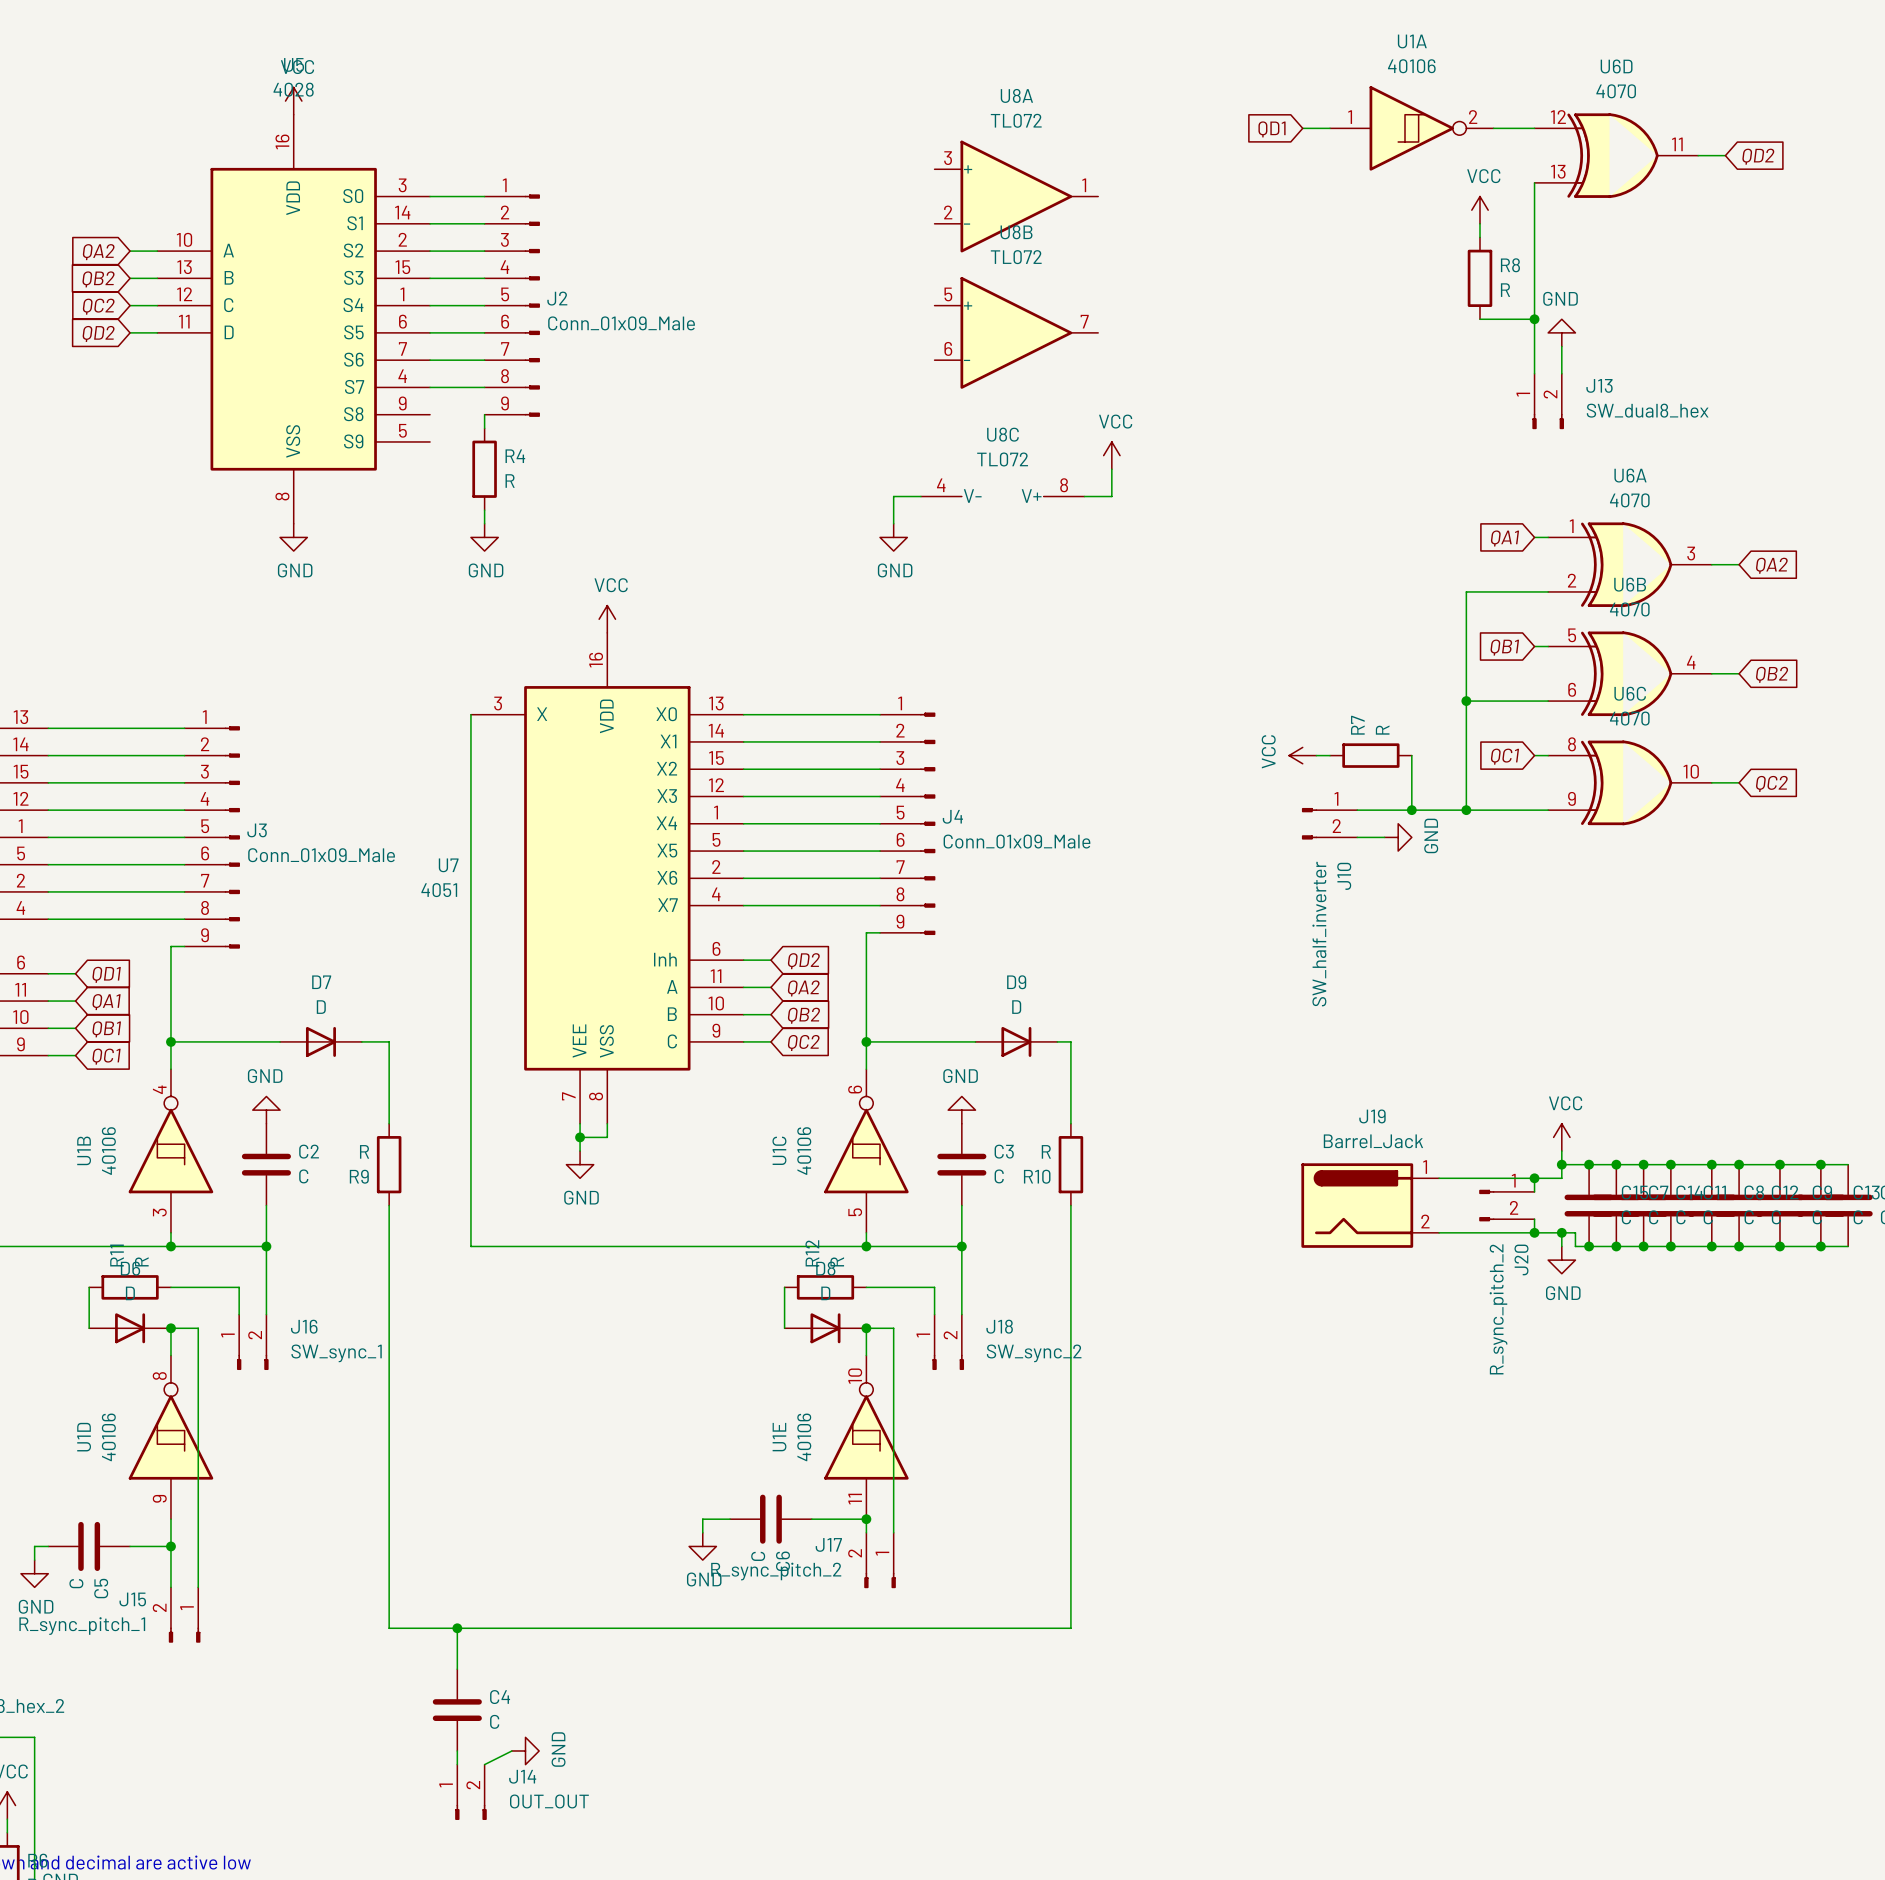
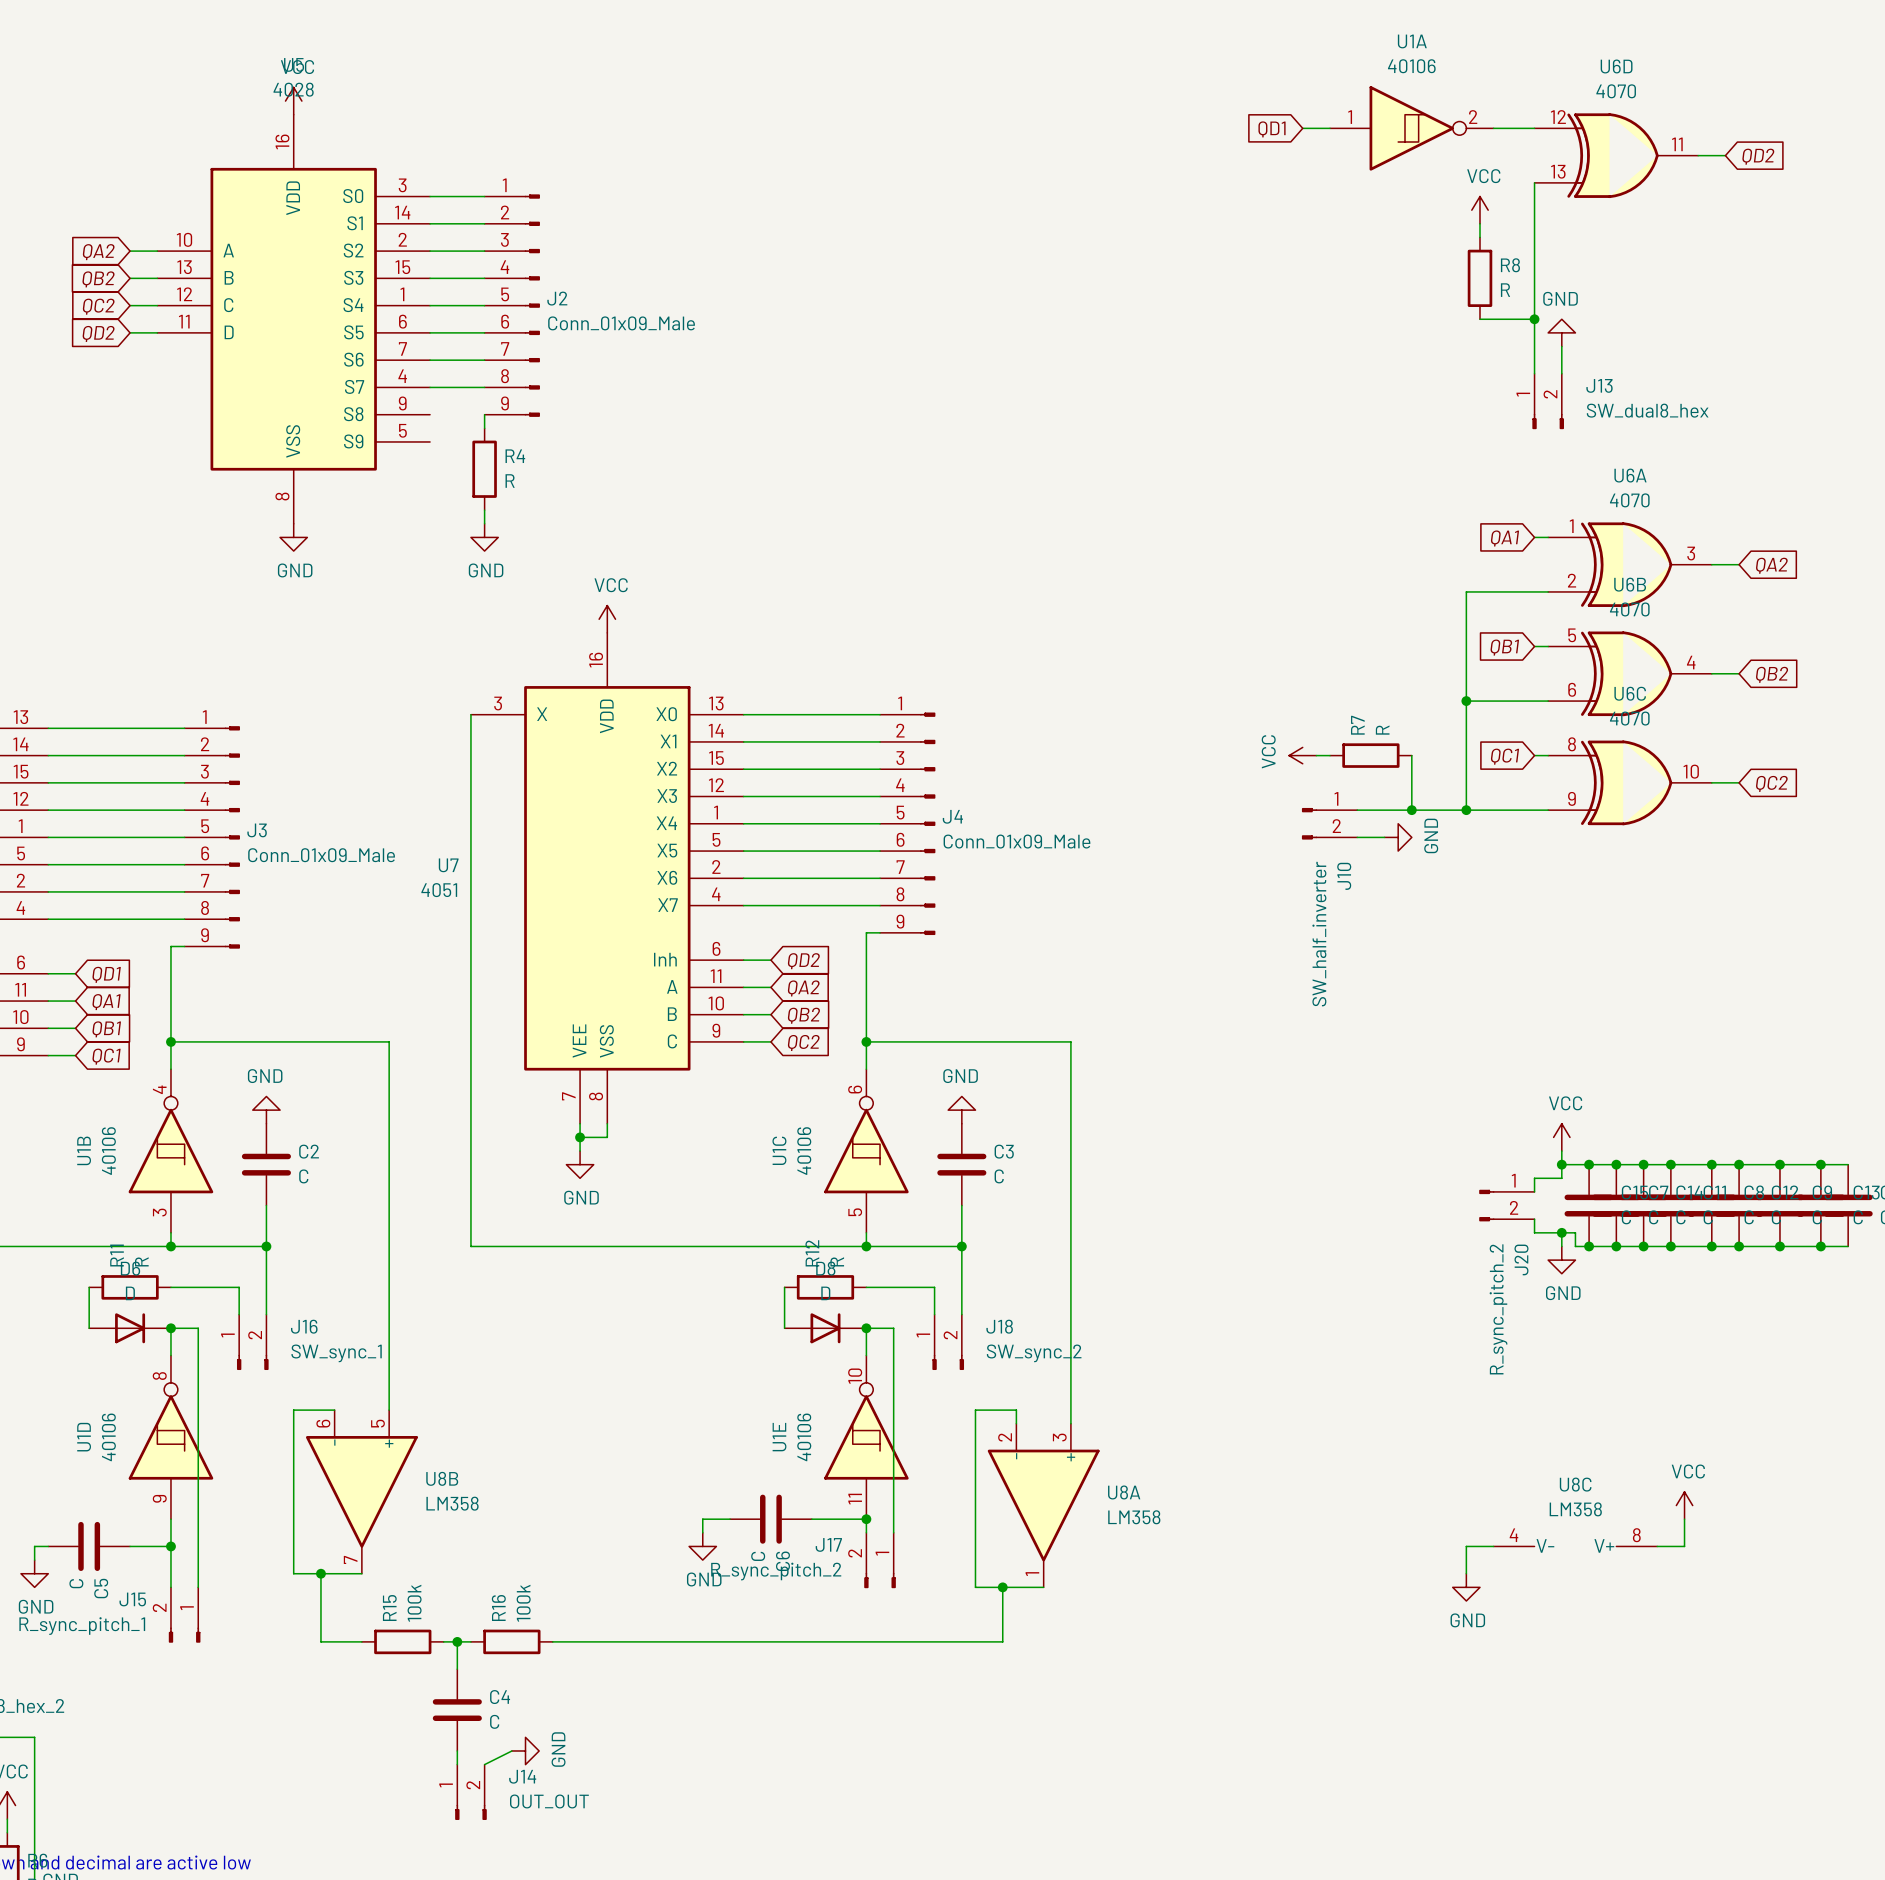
U8A value: TL072 (1016, 120) -> LM358 (1134, 1517)
U8A rotation: 0° (1016, 196) -> 90° clockwise (1043, 1505)
U8A position: (1016, 196) -> (1043, 1505)
U8B value: TL072 (1016, 257) -> LM358 (452, 1503)
U8B rotation: 0° (1016, 332) -> 90° clockwise (361, 1491)
U8B position: (1016, 332) -> (361, 1491)
power symbol: VCC (1111, 455) -> none
U8C value: TL072 (1002, 459) -> LM358 (1575, 1509)
wire: (1111, 469) (1111, 496) (1084, 496) -> none
wire: (920, 496) (893, 496) (893, 523) -> none
U8C position: (1002, 496) -> (1575, 1546)
power symbol: GND (893, 537) -> none
D7: D (320, 1041) -> none
D9: D (1016, 1041) -> none
wire: none -> (389, 1123) (389, 1205)
wire: none -> (1070, 1123) (1070, 1205)
R9: R (389, 1164) -> none
R10: R (1070, 1164) -> none
wire: (1439, 1178) (1534, 1178) -> none
junction: (1534, 1178) -> none
J19: Barrel_Jack (1370, 1205) -> none
wire: (1439, 1232) (1534, 1232) -> none
junction: (1534, 1232) -> none
wire: none -> (334, 1410) (293, 1410) (293, 1573) (361, 1573)
wire: (389, 1410) (389, 1628) (1070, 1628) (1070, 1423) -> none
wire: none -> (1016, 1423) (1016, 1410) (975, 1410) (975, 1587) (1043, 1587)
power symbol: none -> VCC (1684, 1505)
wire: none -> (1684, 1519) (1684, 1546) (1657, 1546)
wire: none -> (1493, 1546) (1466, 1546) (1466, 1573)
wire: none -> (320, 1573) (320, 1641) (361, 1641)
junction: none -> (320, 1573)
wire: none -> (1002, 1587) (1002, 1641) (552, 1641)
junction: none -> (1002, 1587)
power symbol: none -> GND (1466, 1587)
wire: (457, 1628) (457, 1641) -> none
junction position: (457, 1628) -> (457, 1641)
R15: none -> 100k (402, 1641)
wire: none -> (443, 1641) (470, 1641)
R16: none -> 100k (511, 1641)

